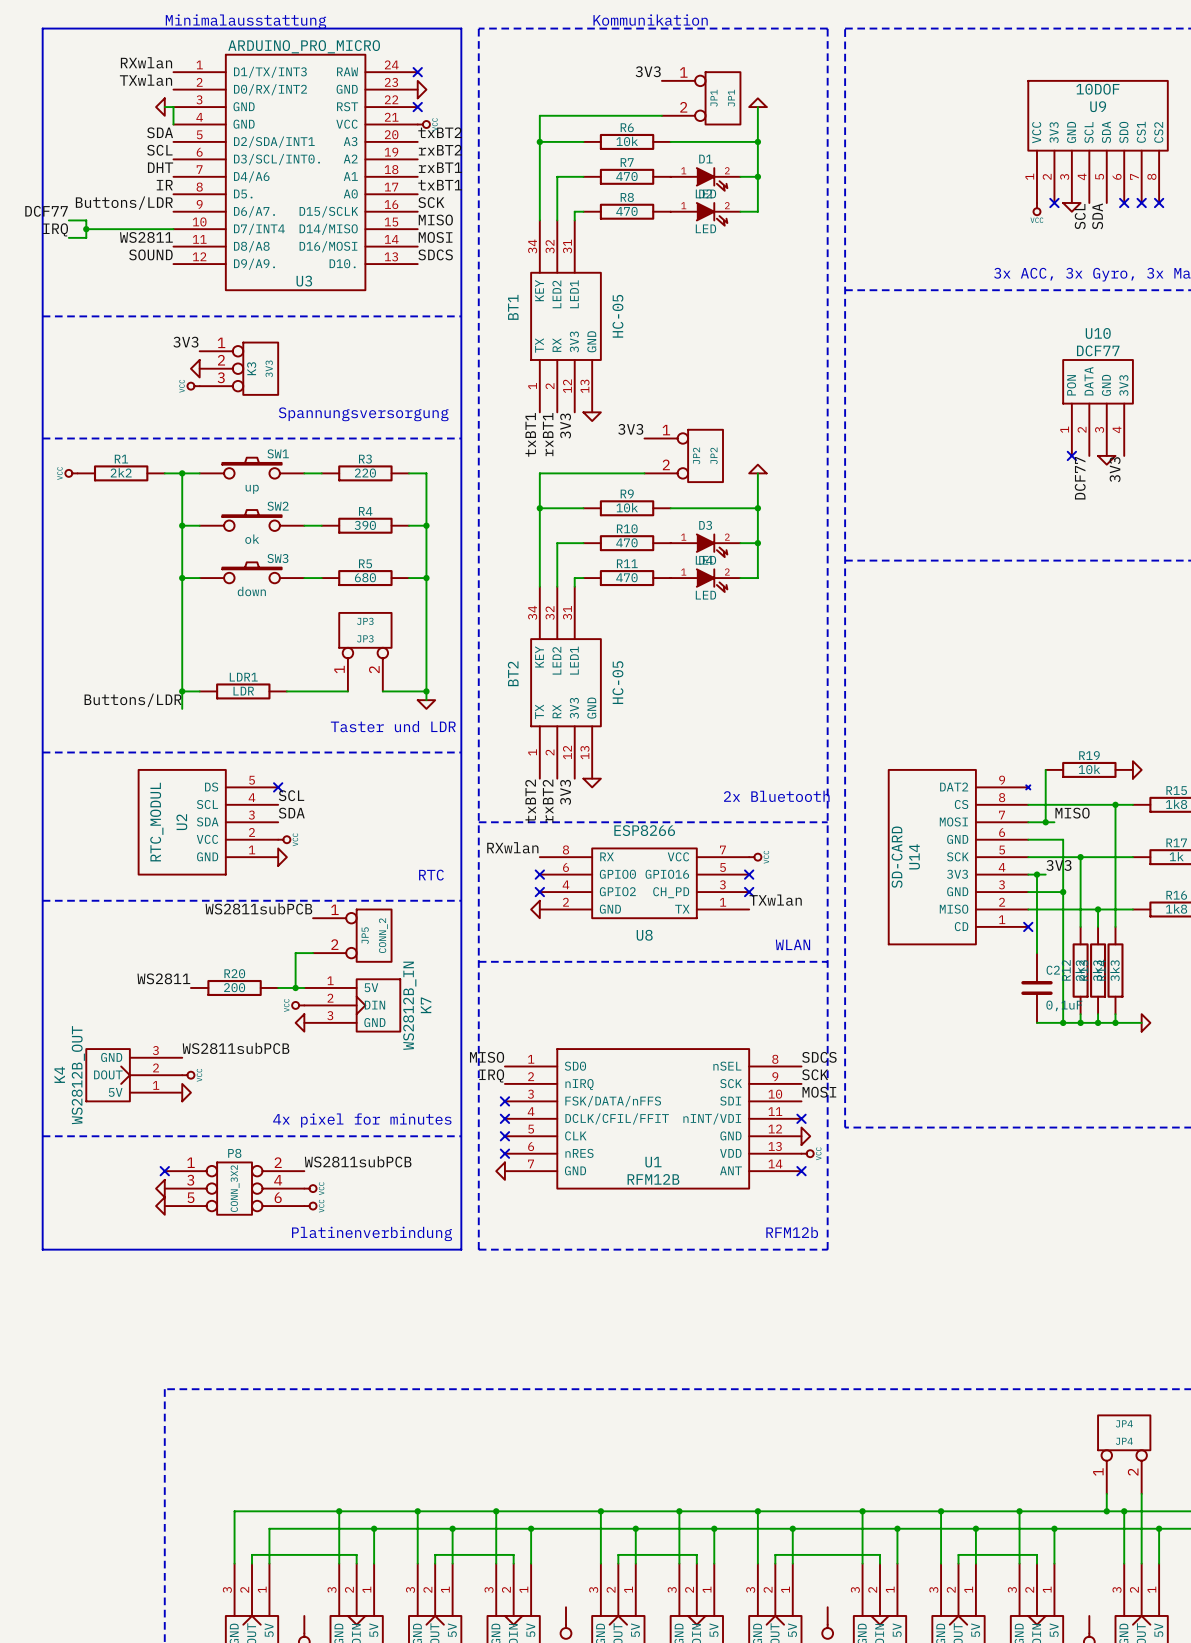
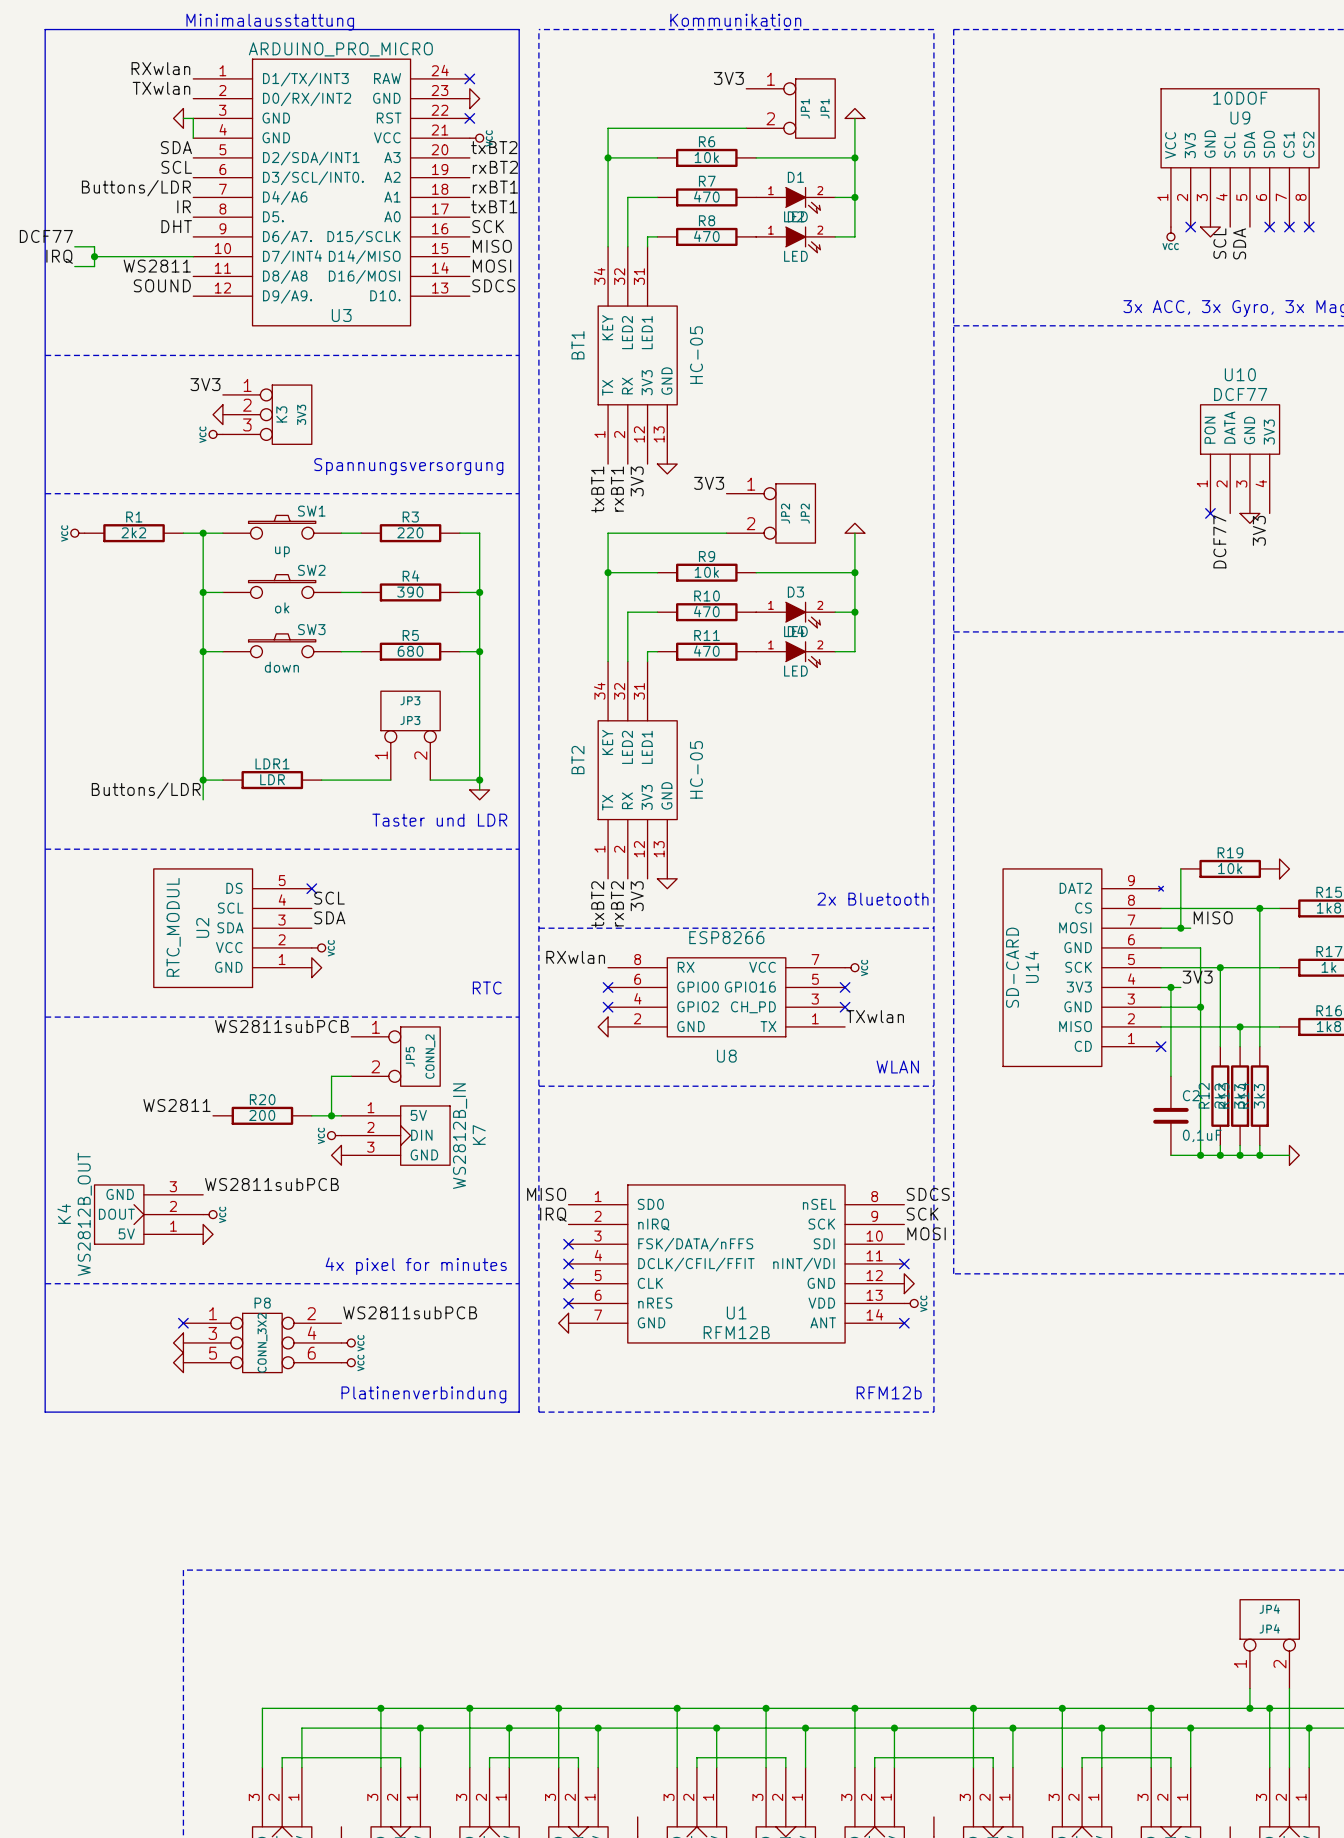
label: DHT (160, 167) -> Buttons/LDR (136, 188)
label: Buttons/LDR (124, 203) -> DHT (176, 226)

